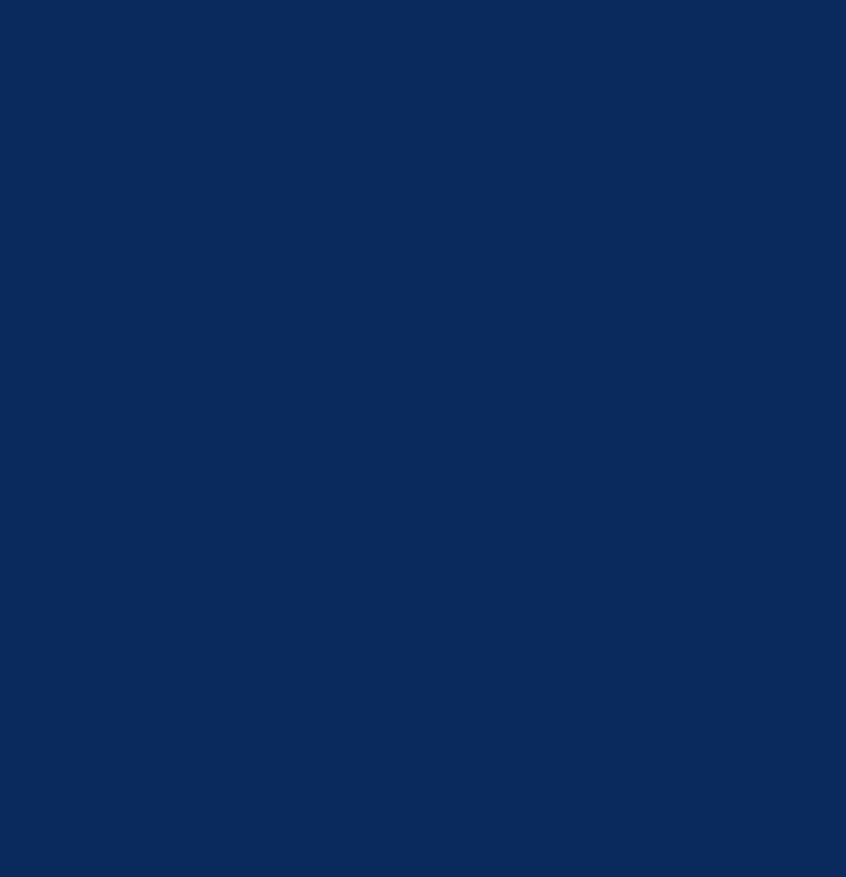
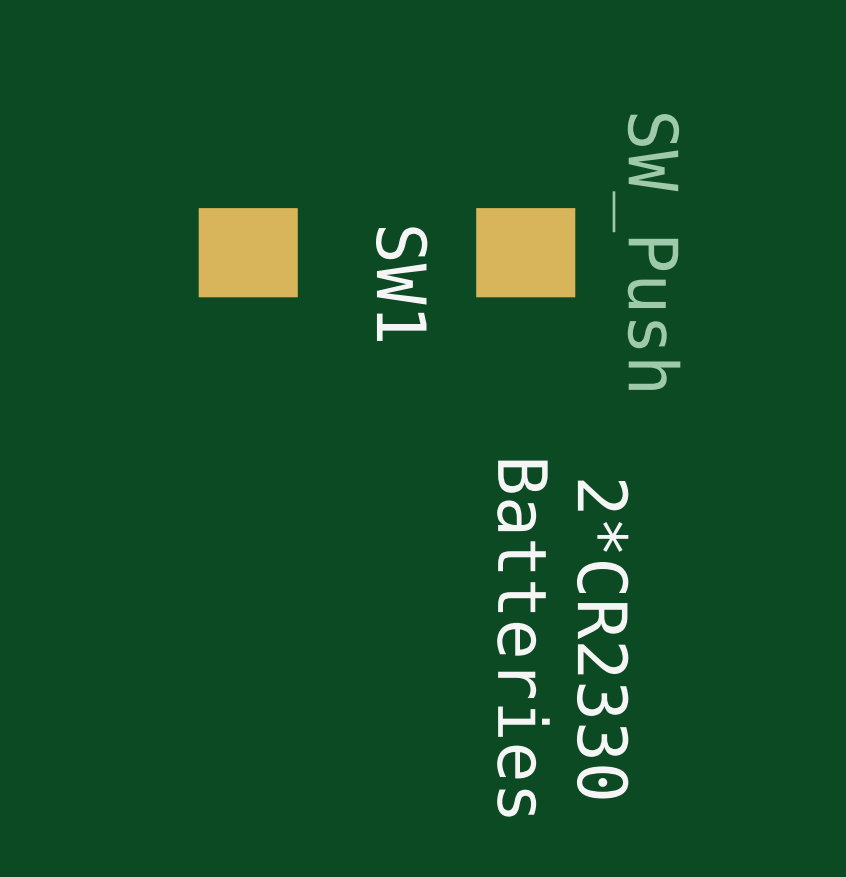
SW1: none -> SW_Push (386, 252)
text: none -> 2*CR2330 (602, 639)
text: none -> Batteries (523, 638)

